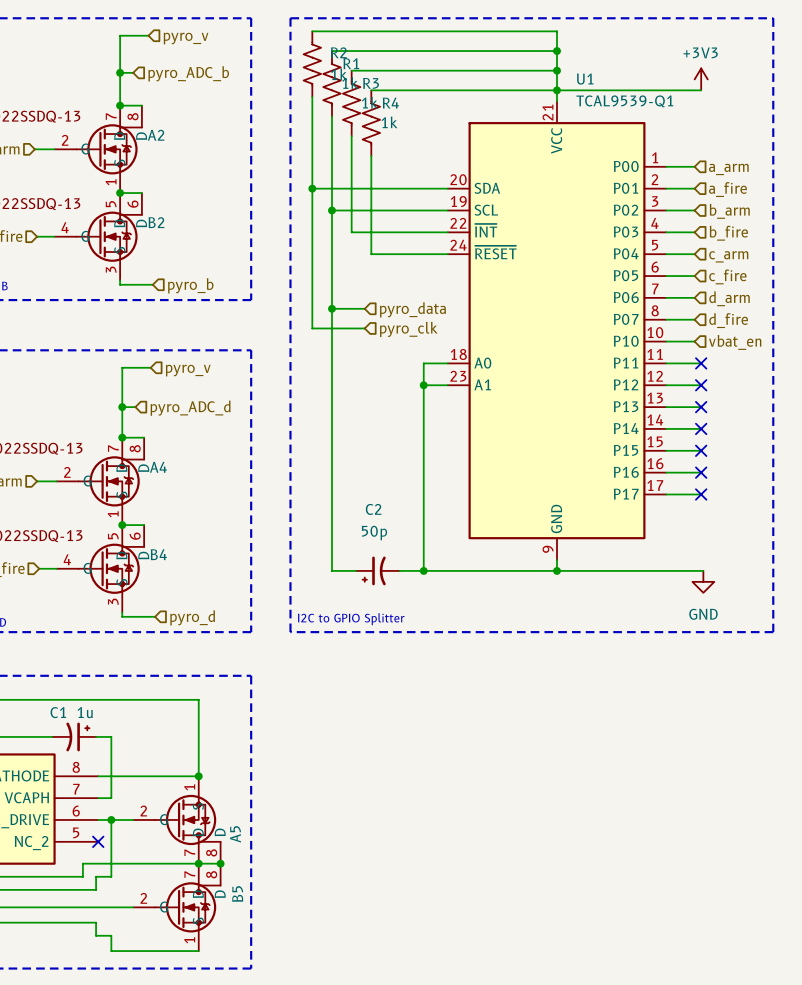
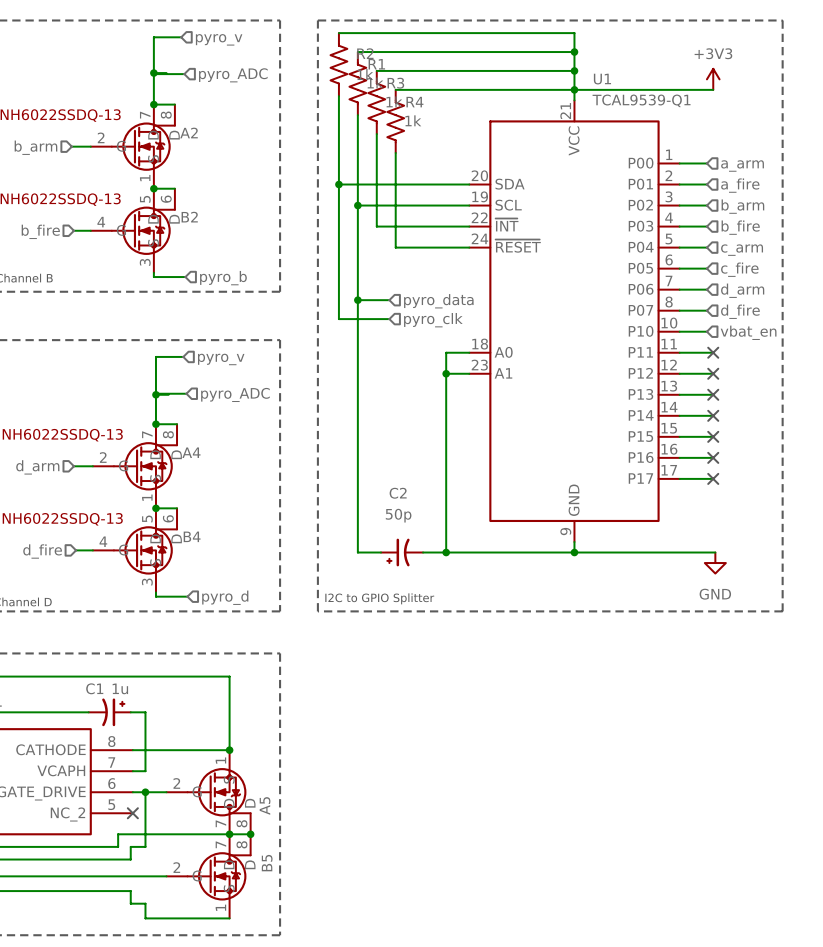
wire: none -> (153, 74) (184, 74)
hierarchical label: pyro_ADC_b (188, 73) -> pyro_ADC (233, 75)
wire: none -> (155, 393) (186, 393)
hierarchical label: pyro_ADC_d (190, 408) -> pyro_ADC (235, 394)

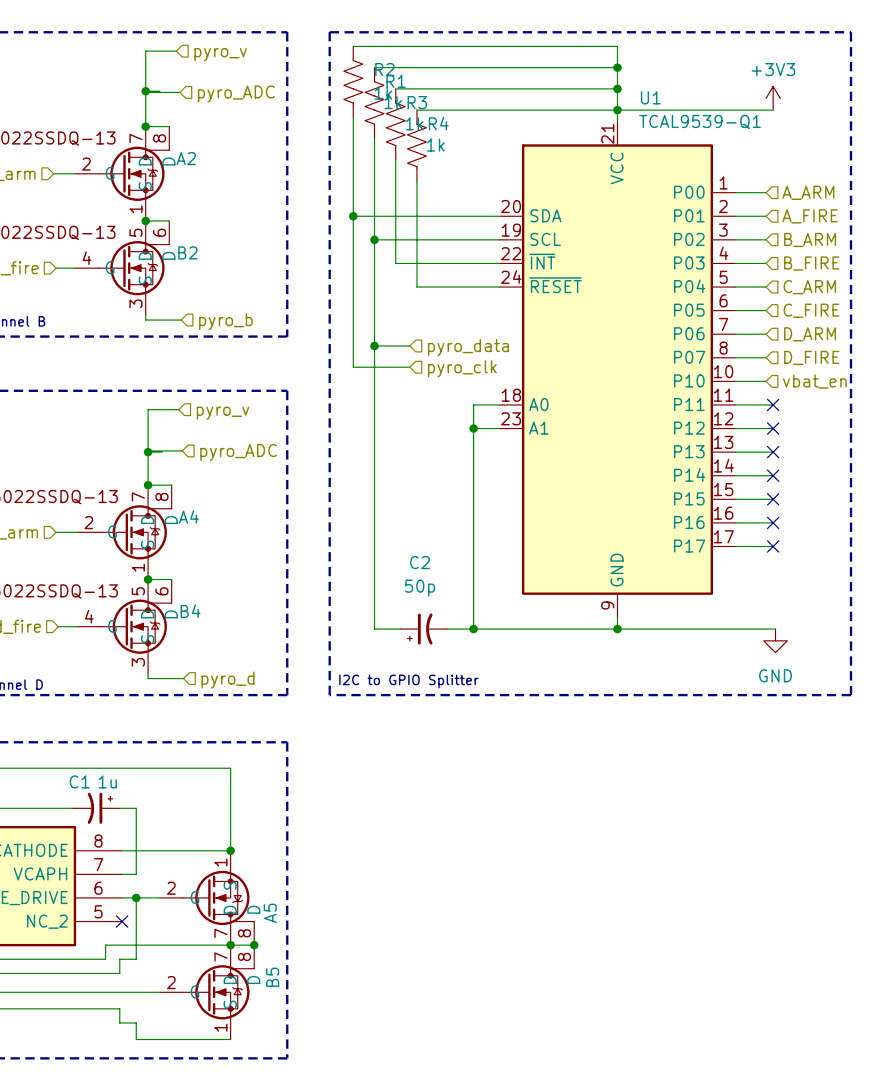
hierarchical label: a_arm (742, 166) -> A_ARM (808, 192)
hierarchical label: a_fire (740, 185) -> A_FIRE (810, 216)
hierarchical label: b_arm (742, 206) -> B_ARM (810, 239)
hierarchical label: b_fire (740, 227) -> B_FIRE (811, 263)
hierarchical label: c_arm (742, 250) -> C_ARM (809, 287)
hierarchical label: c_fire (739, 269) -> C_FIRE (811, 310)
hierarchical label: d_arm (742, 290) -> D_ARM (810, 334)
hierarchical label: d_fire (740, 311) -> D_FIRE (811, 357)

